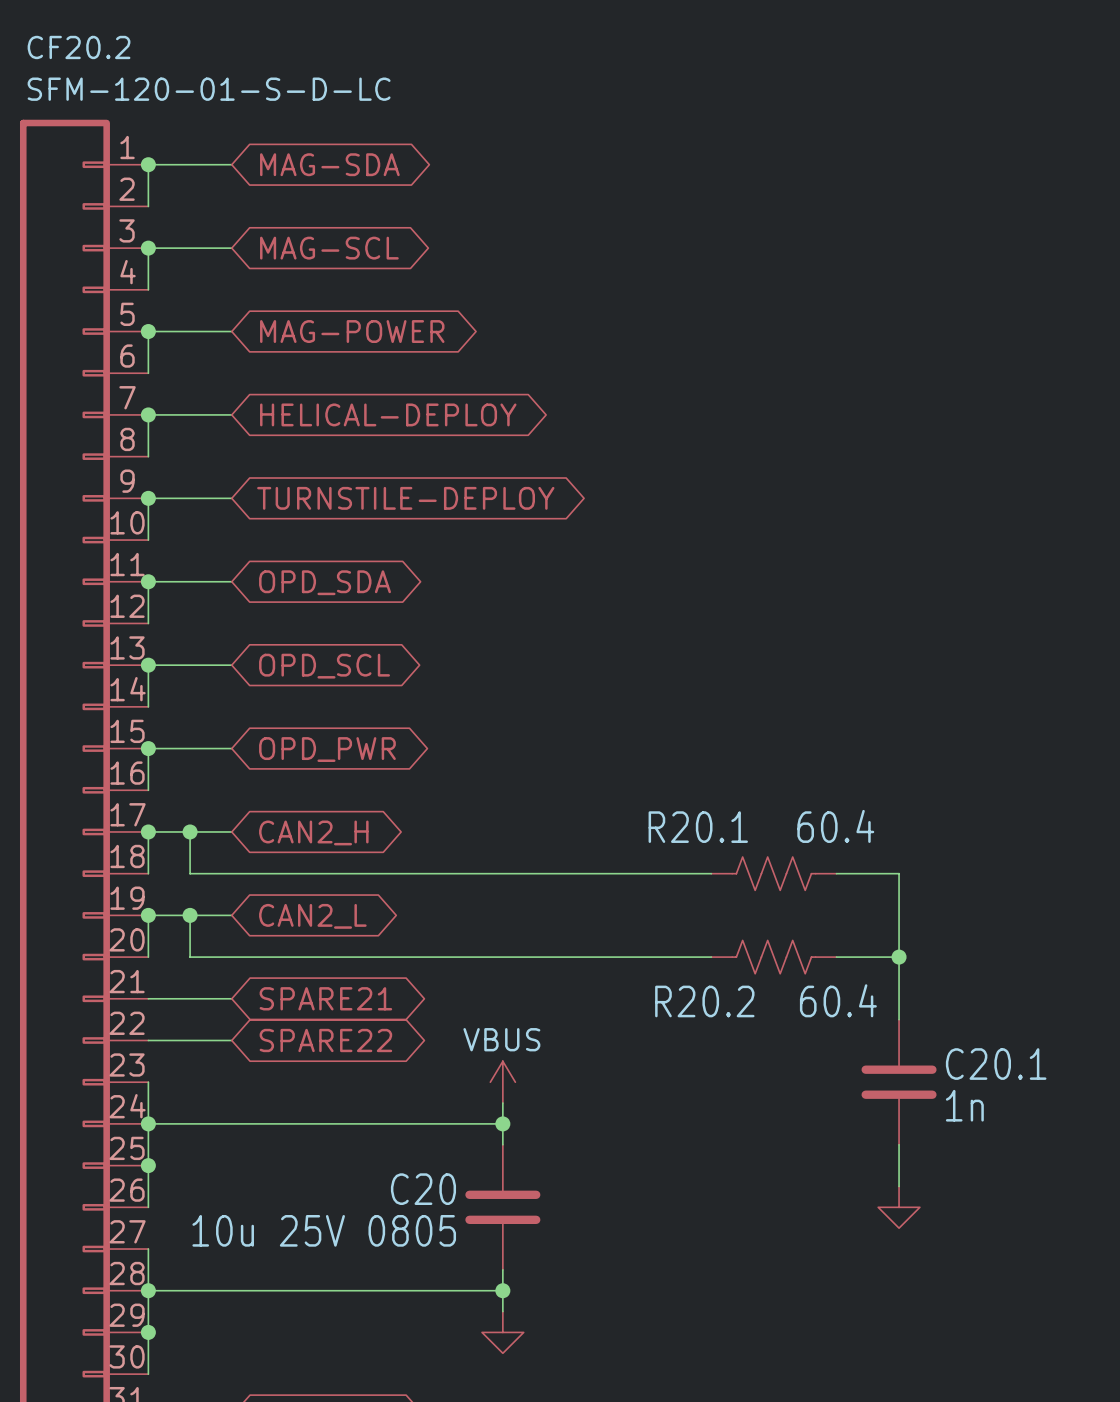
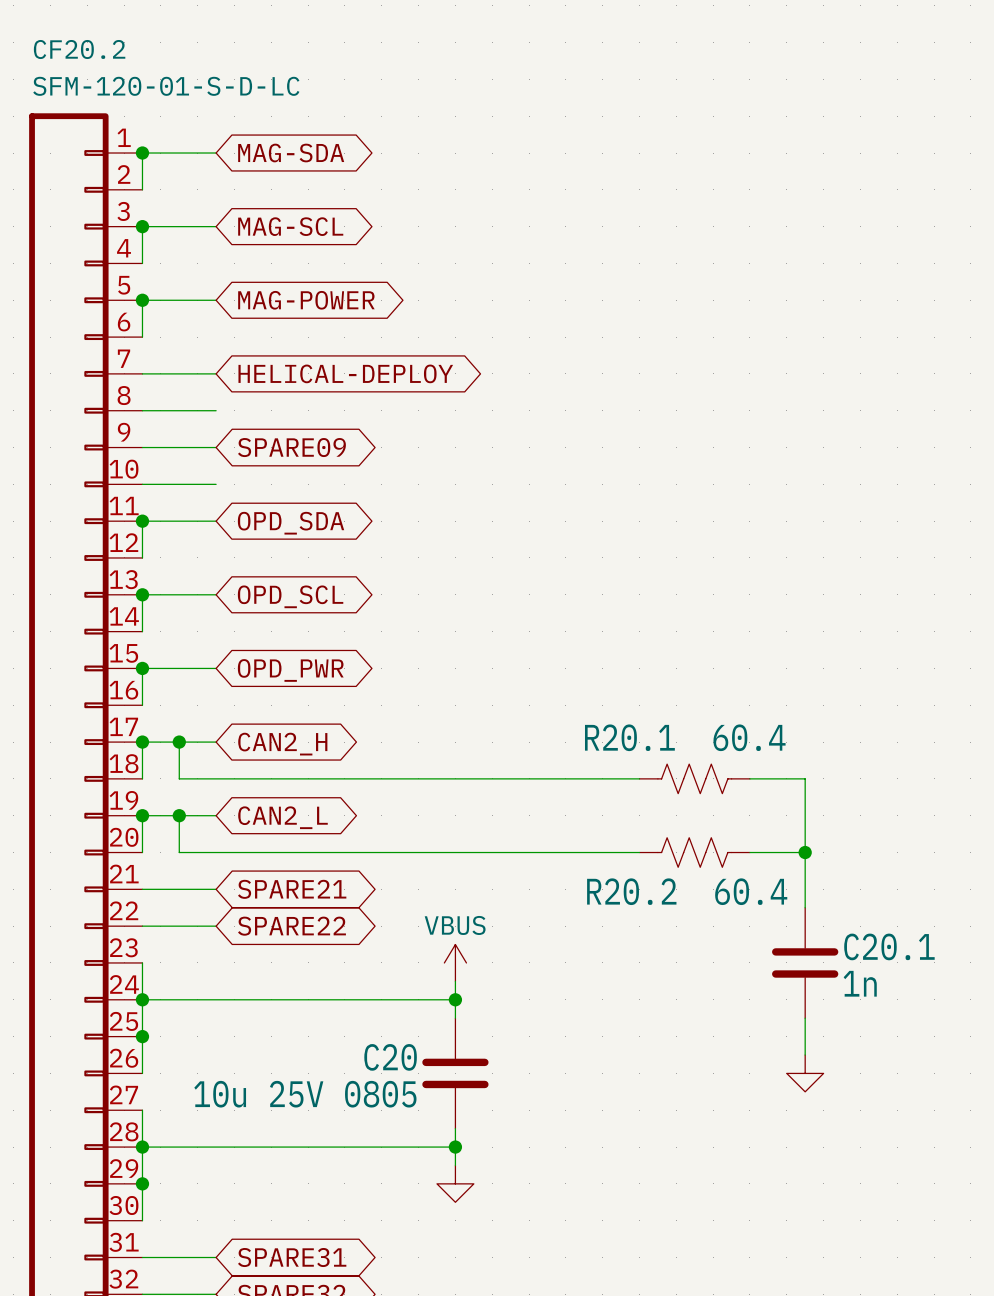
wire: (148, 414) (148, 456) -> (216, 410) (142, 410)
junction: (148, 414) -> none
wire: (148, 498) (148, 540) -> (216, 484) (142, 484)
junction: (148, 498) -> none
global label: TURNSTILE-DEPLOY (405, 498) -> SPARE09 (291, 447)

